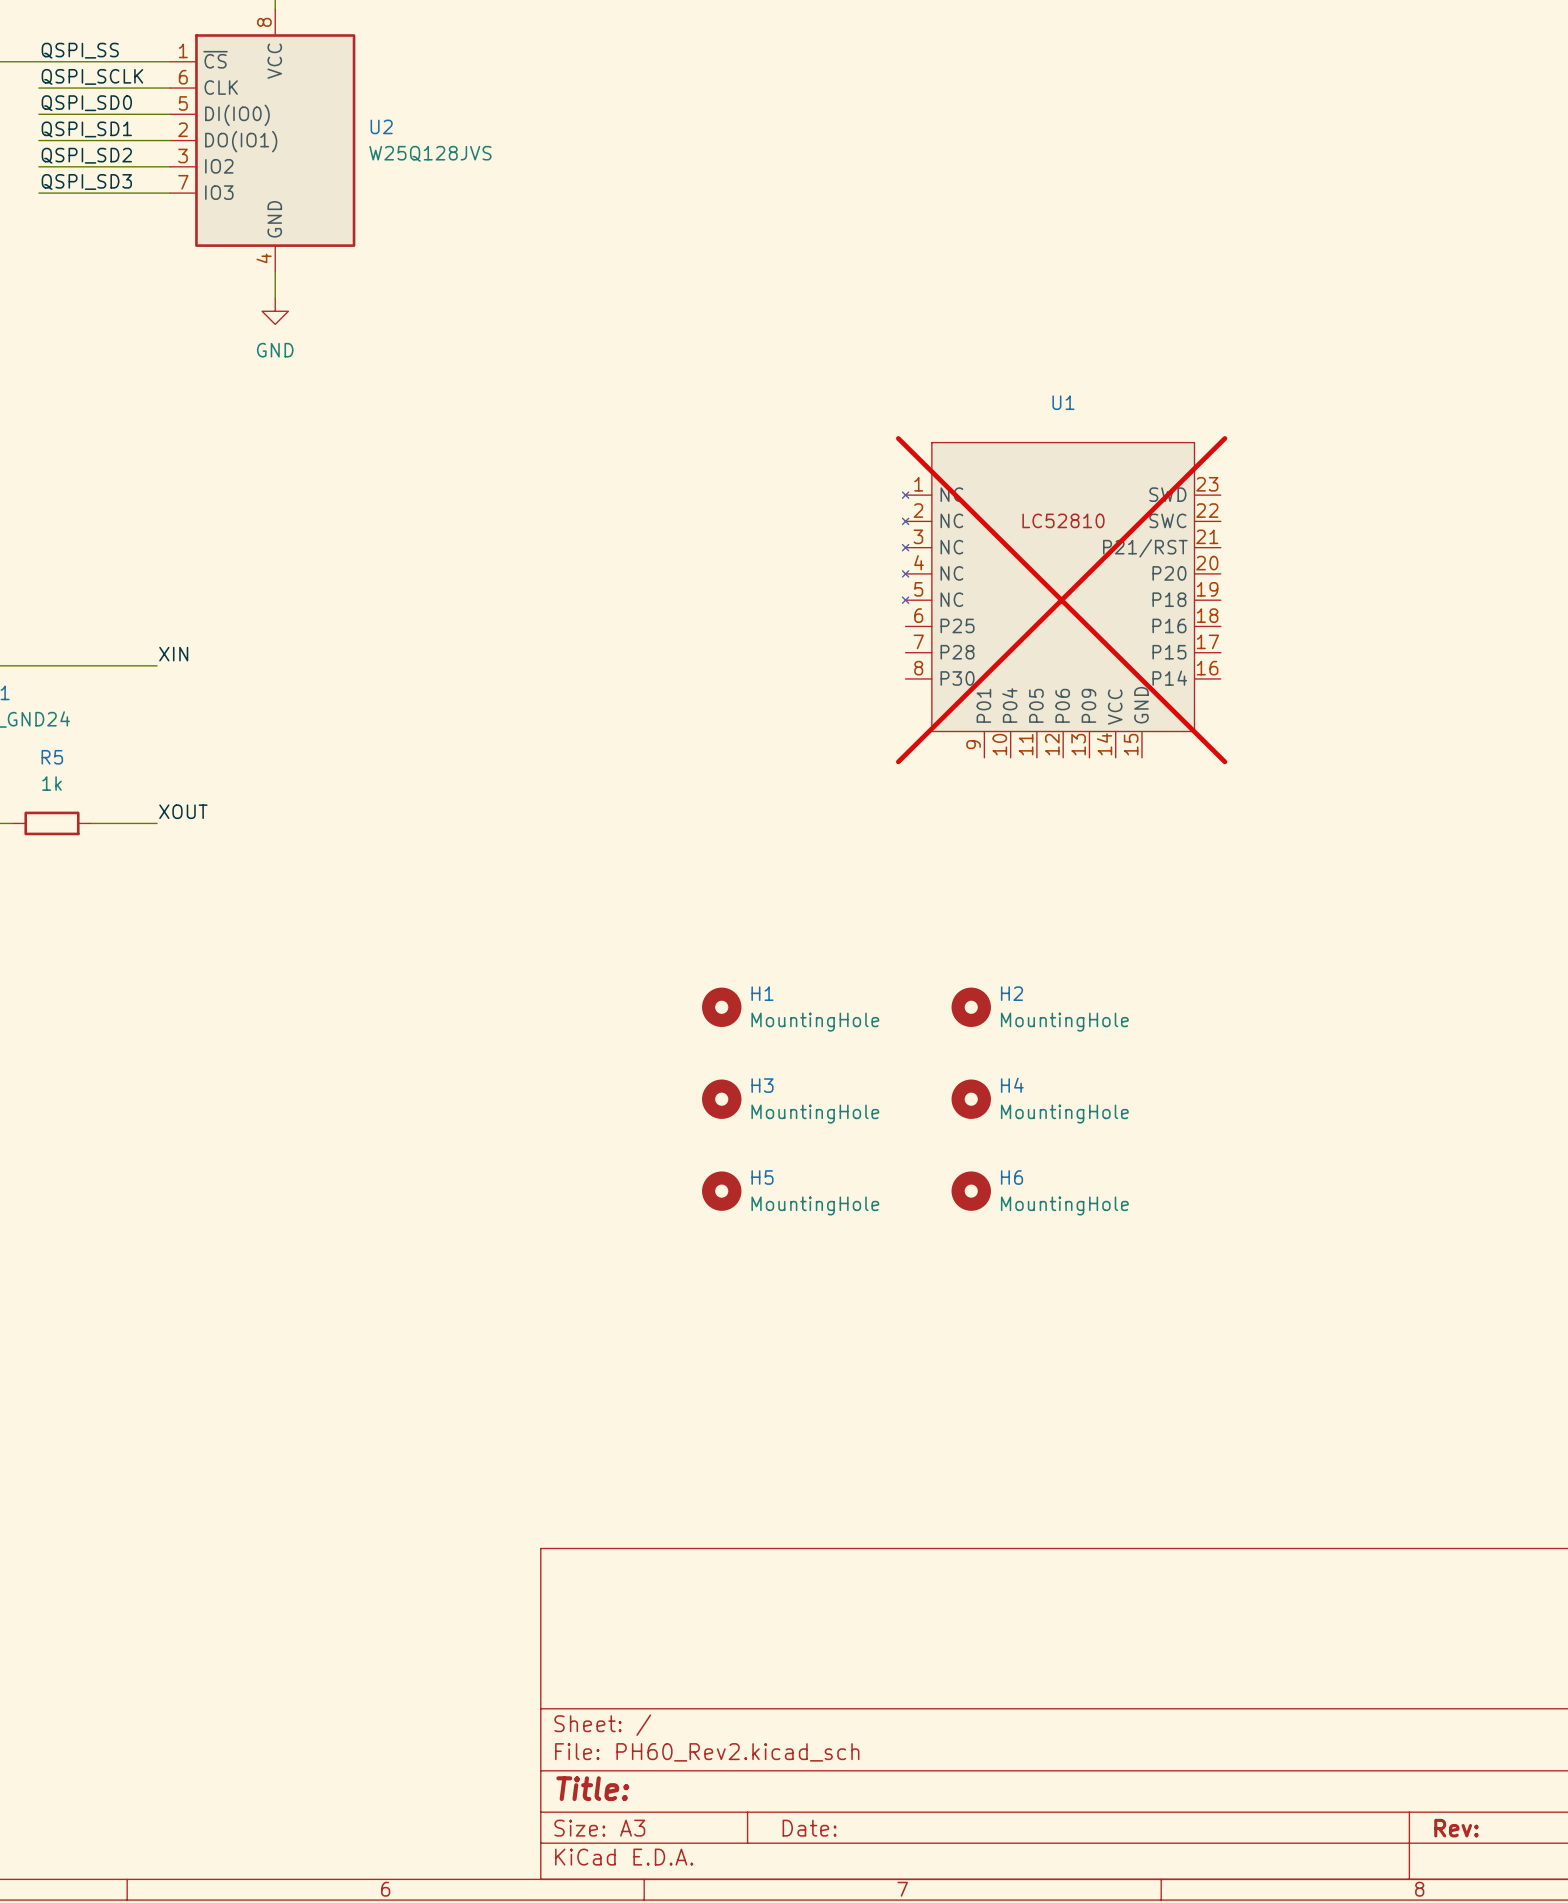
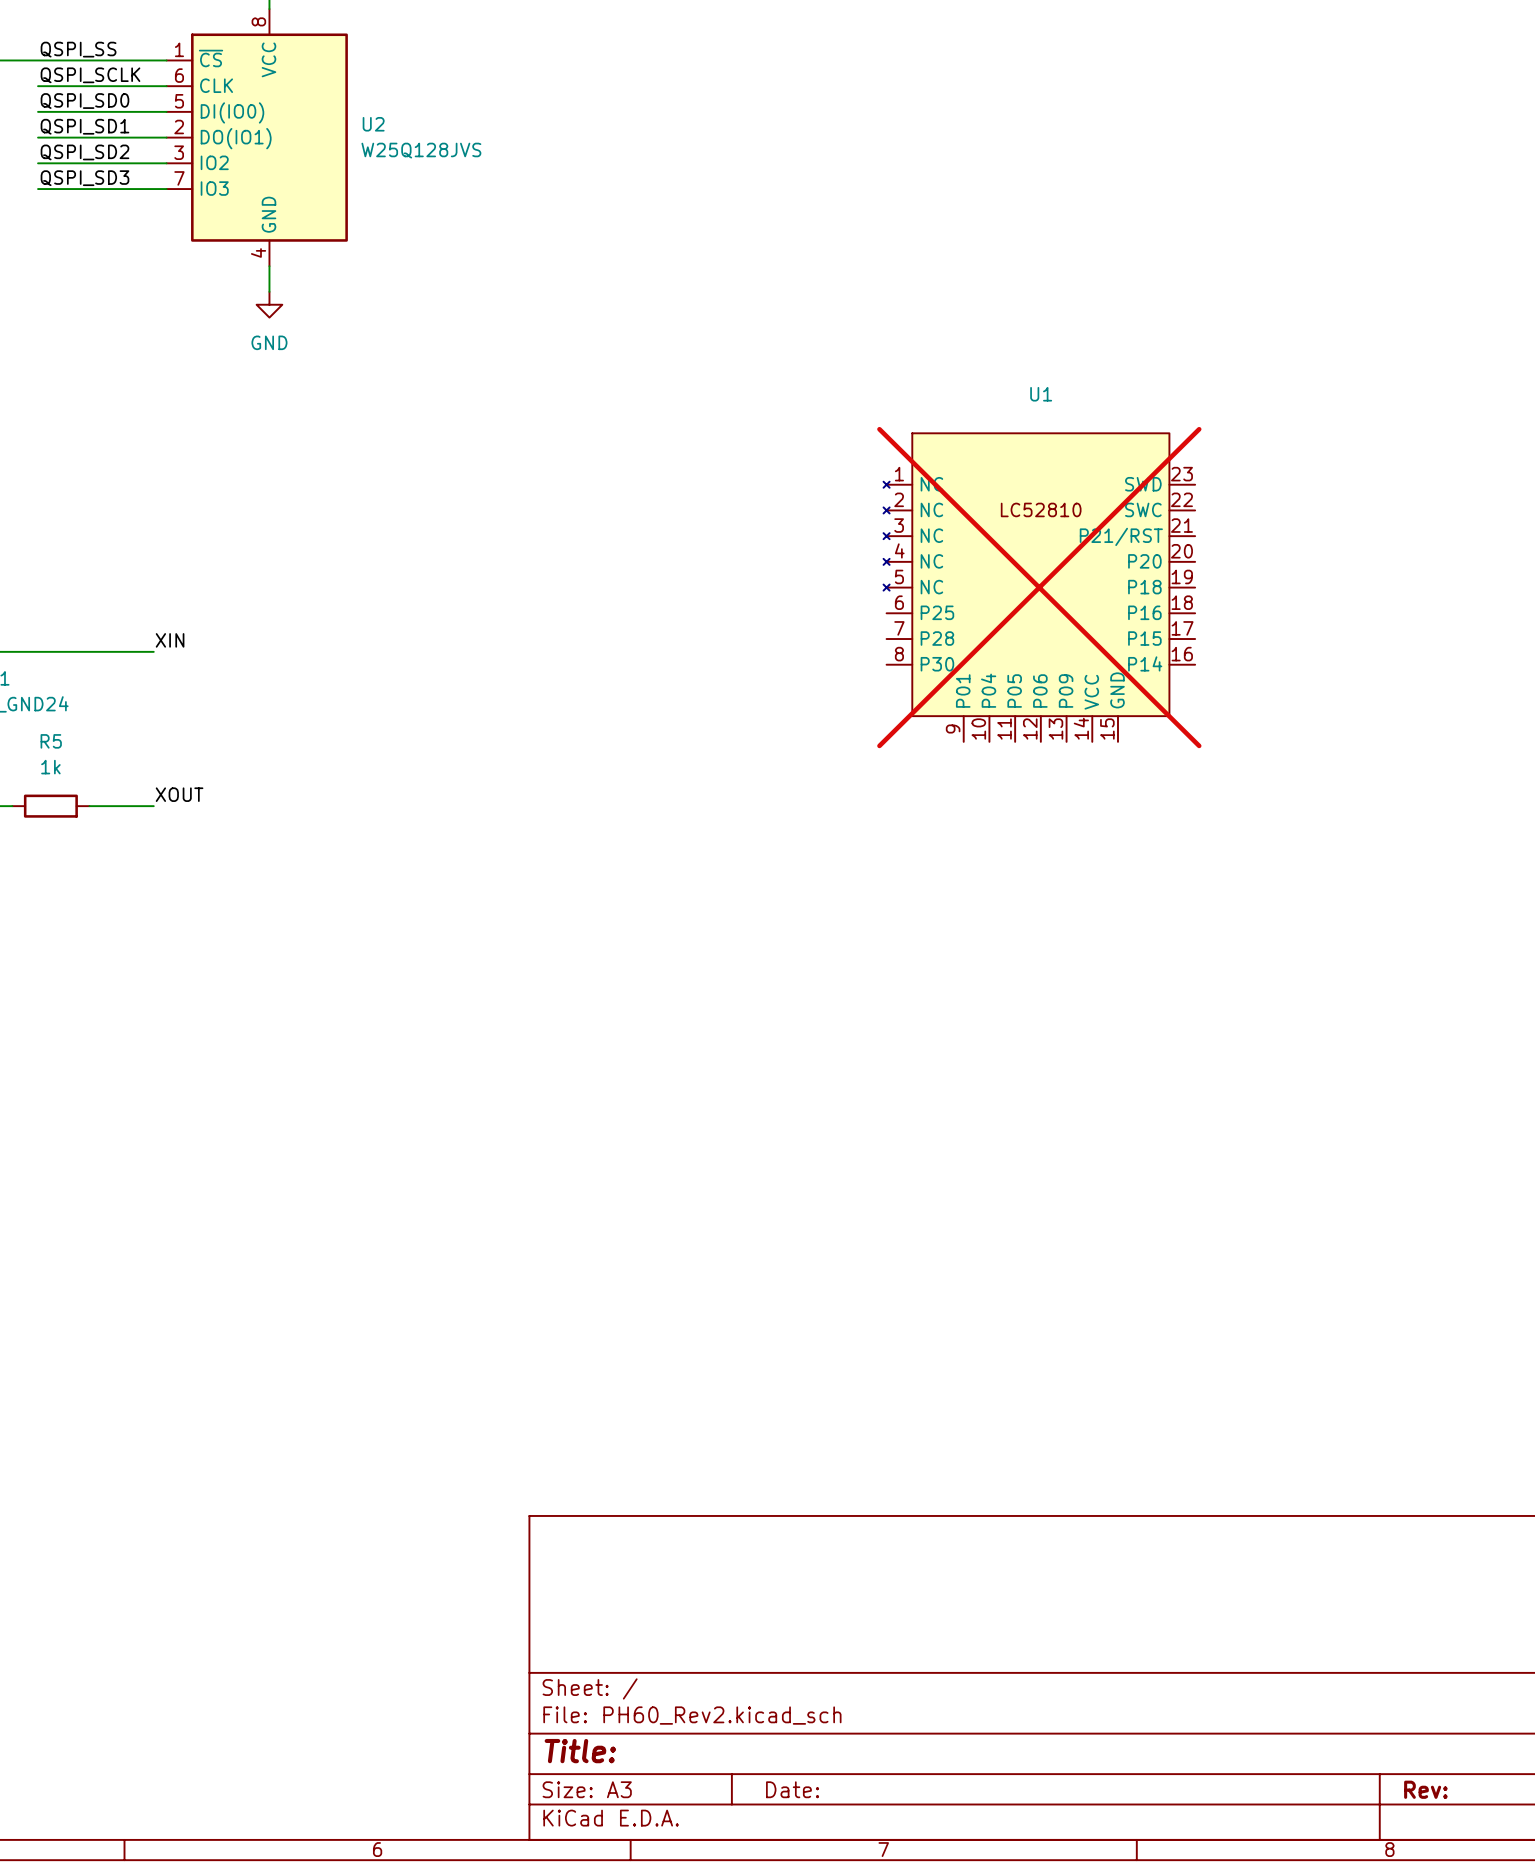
H1: MountingHole (721, 1007) -> none
H2: MountingHole (971, 1007) -> none
H3: MountingHole (721, 1099) -> none
H4: MountingHole (971, 1099) -> none
H5: MountingHole (721, 1191) -> none
H6: MountingHole (971, 1191) -> none

